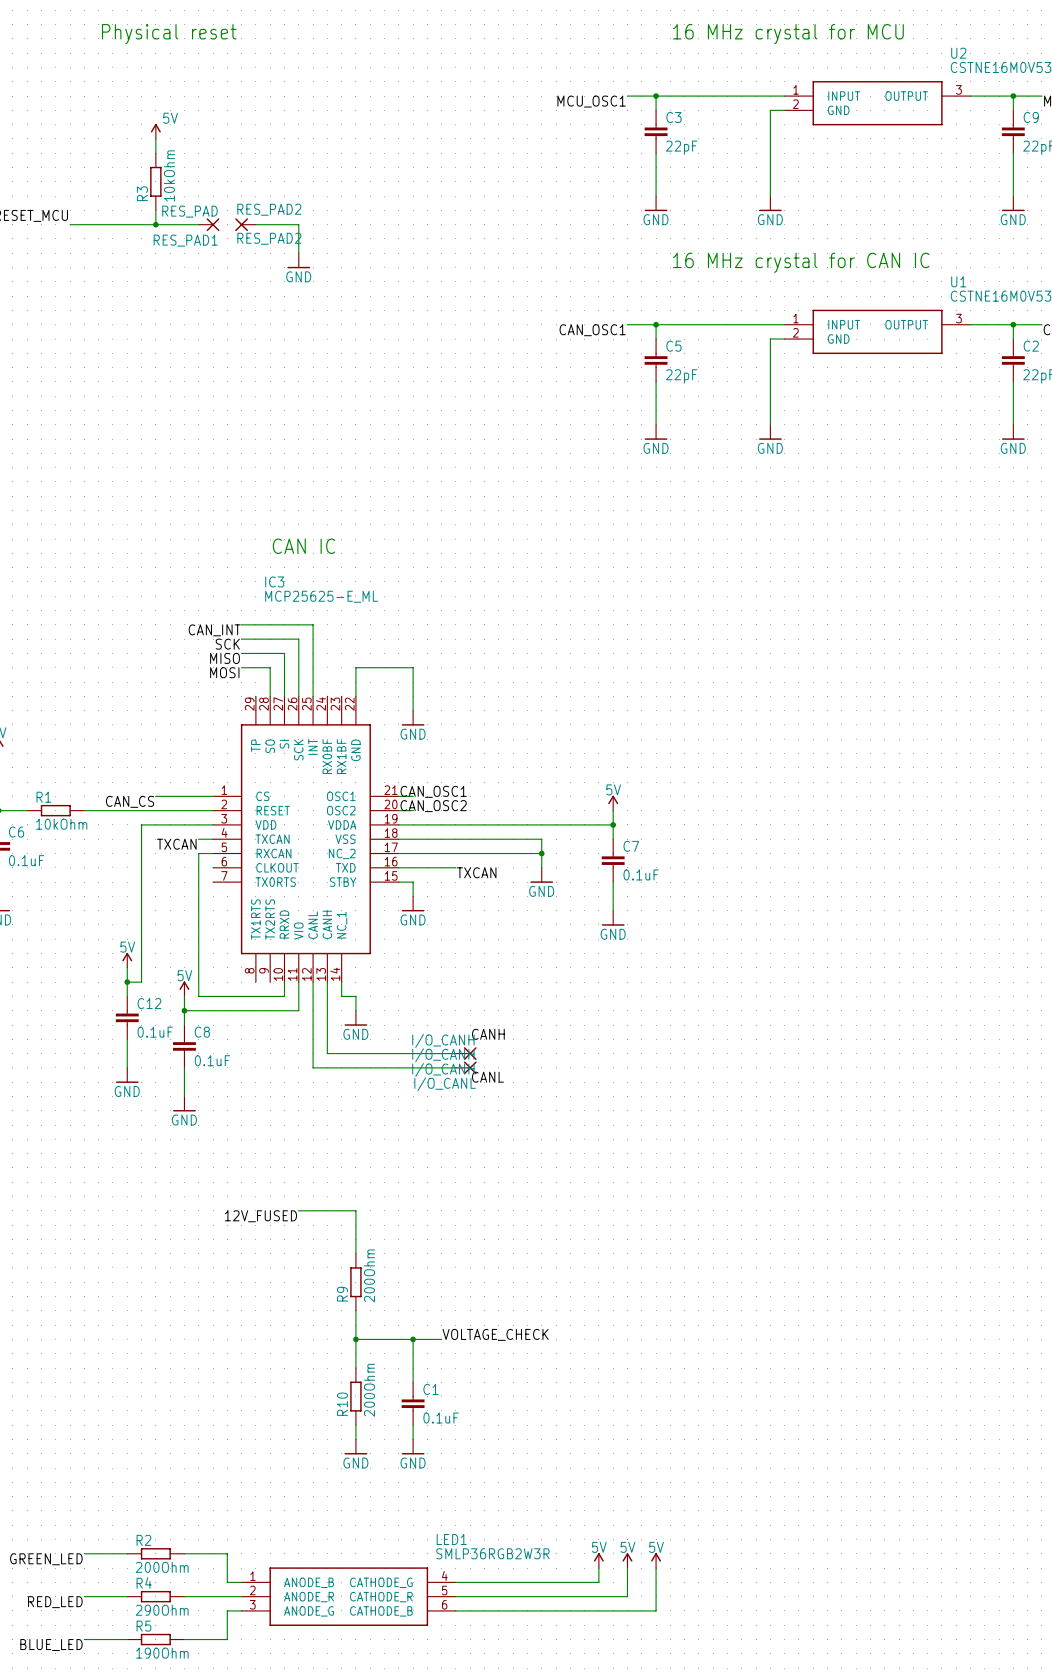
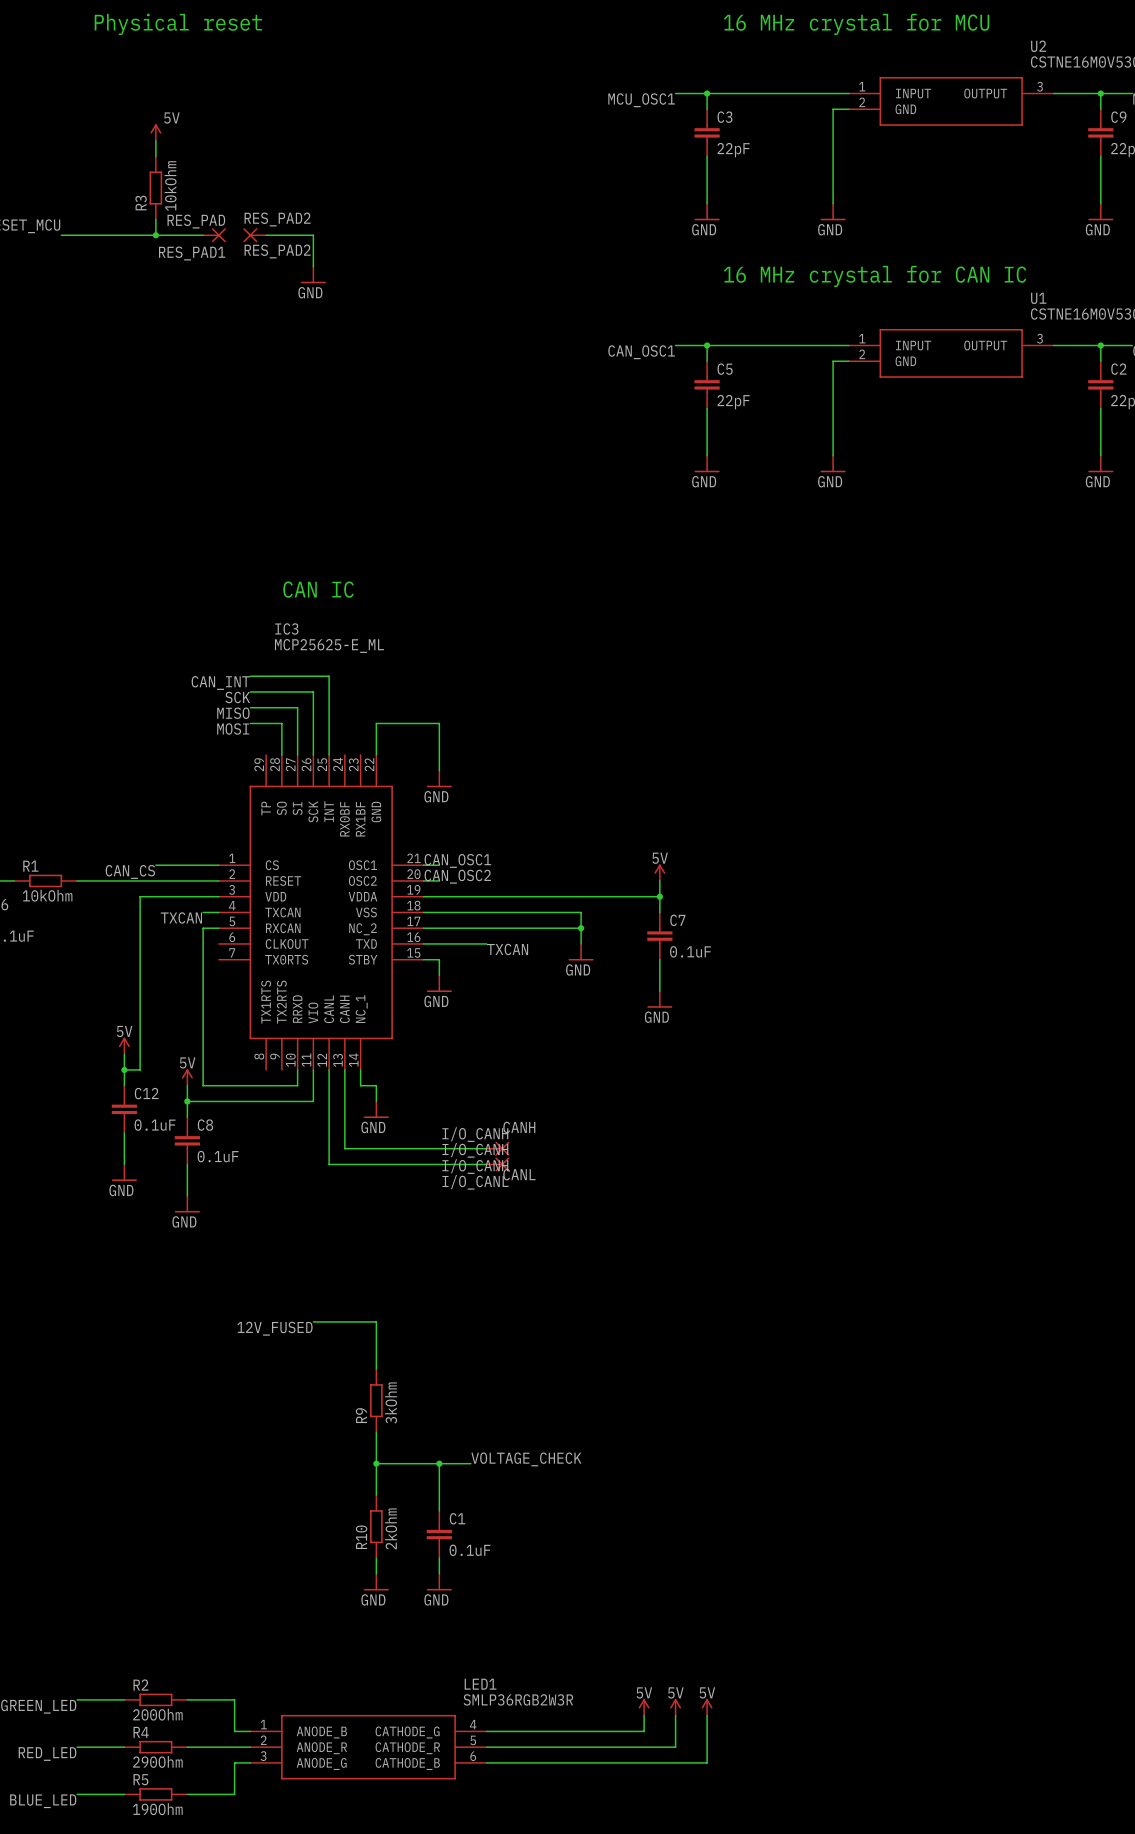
R9 value: 200Ohm (369, 1275) -> 3kOhm (391, 1403)
R10 value: 200Ohm (369, 1390) -> 2kOhm (391, 1528)

